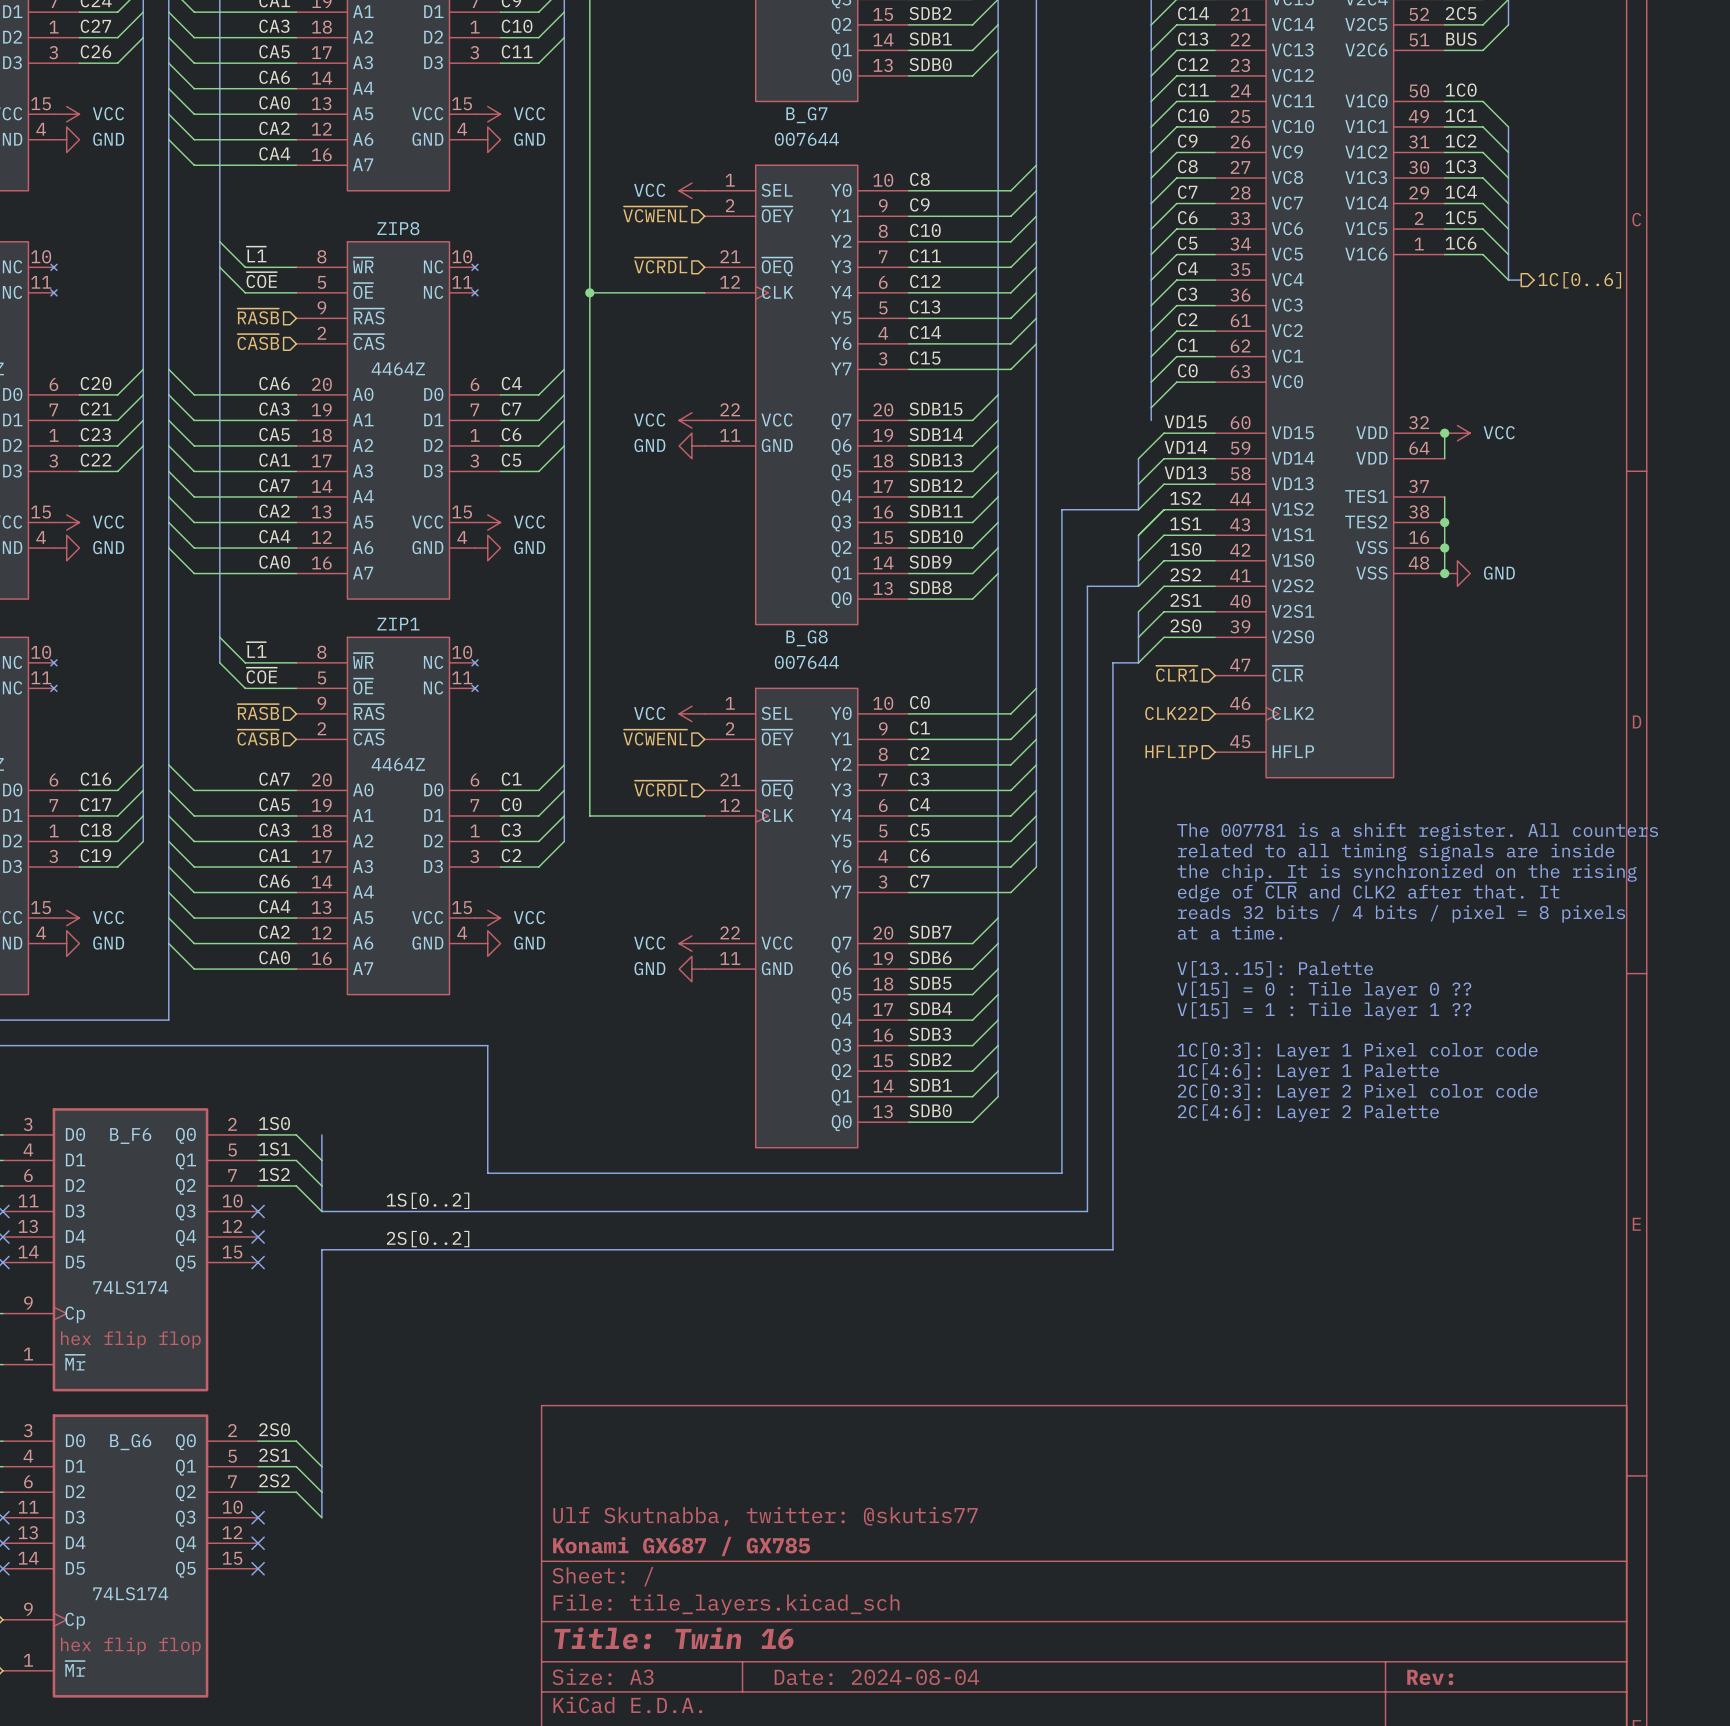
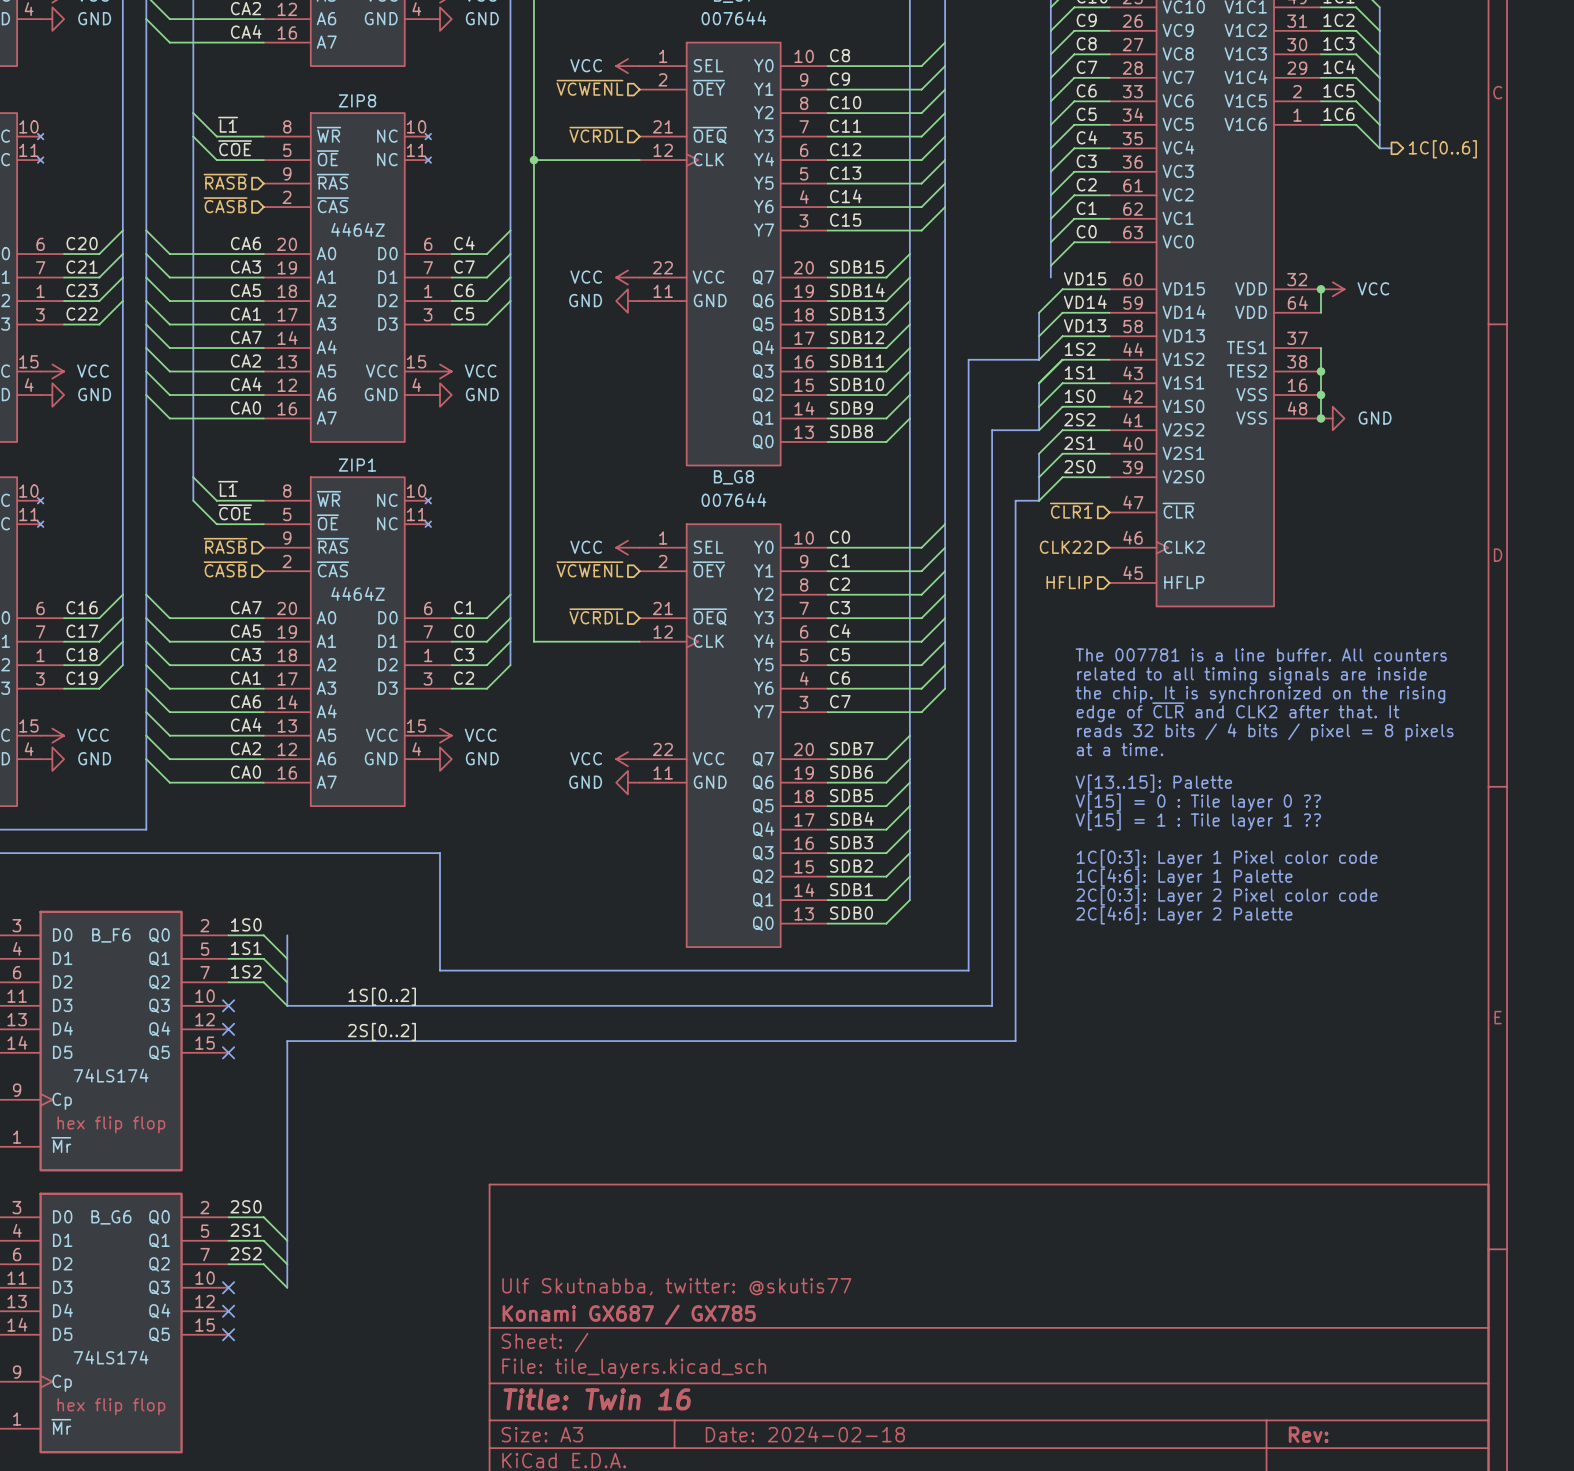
text: The 007781 is a shift register. All counters (1417, 831) -> The 007781 is a line buffer. All counters (1261, 654)
title block: Date: 2024-08-04 (876, 1677) -> Date: 2024-02-18 (805, 1434)

